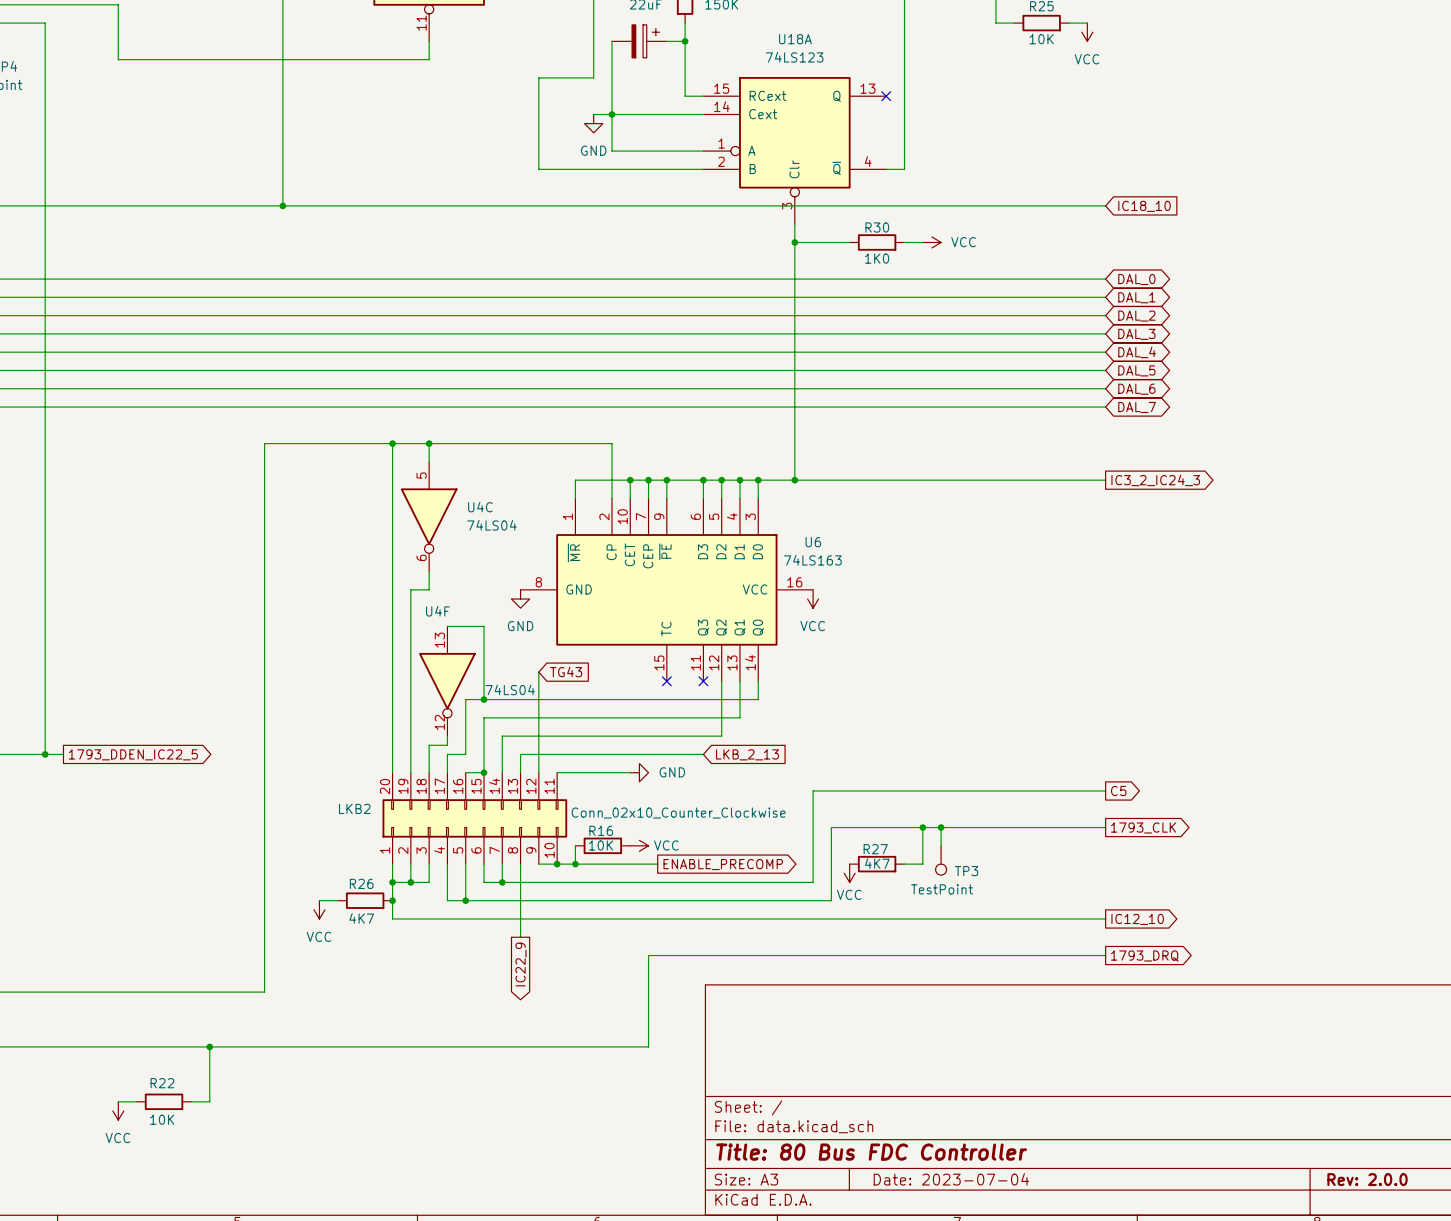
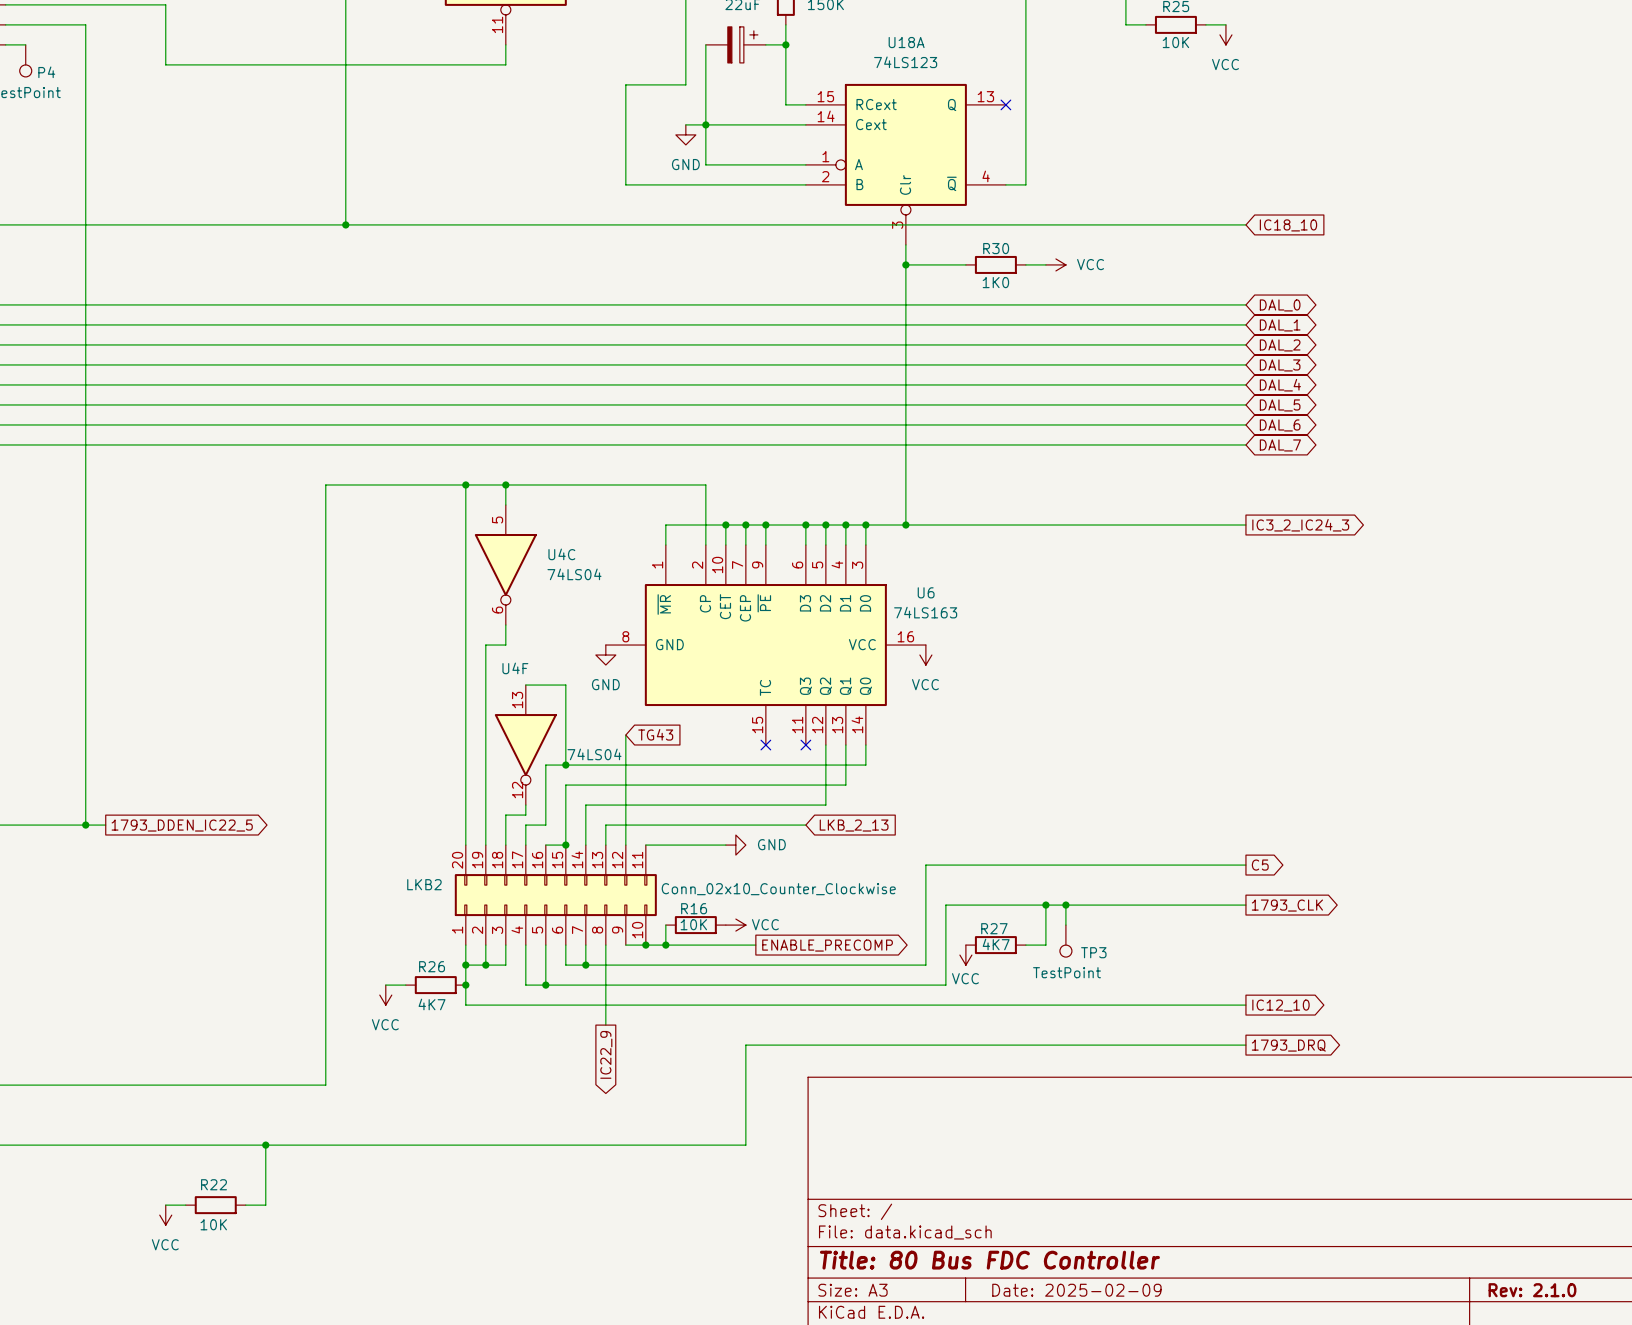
title block: Date: 2023-07-04 (951, 1179) -> Date: 2025-02-09 (1076, 1290)
title block: Rev: 2.0.0 (1367, 1179) -> Rev: 2.1.0 (1532, 1290)

